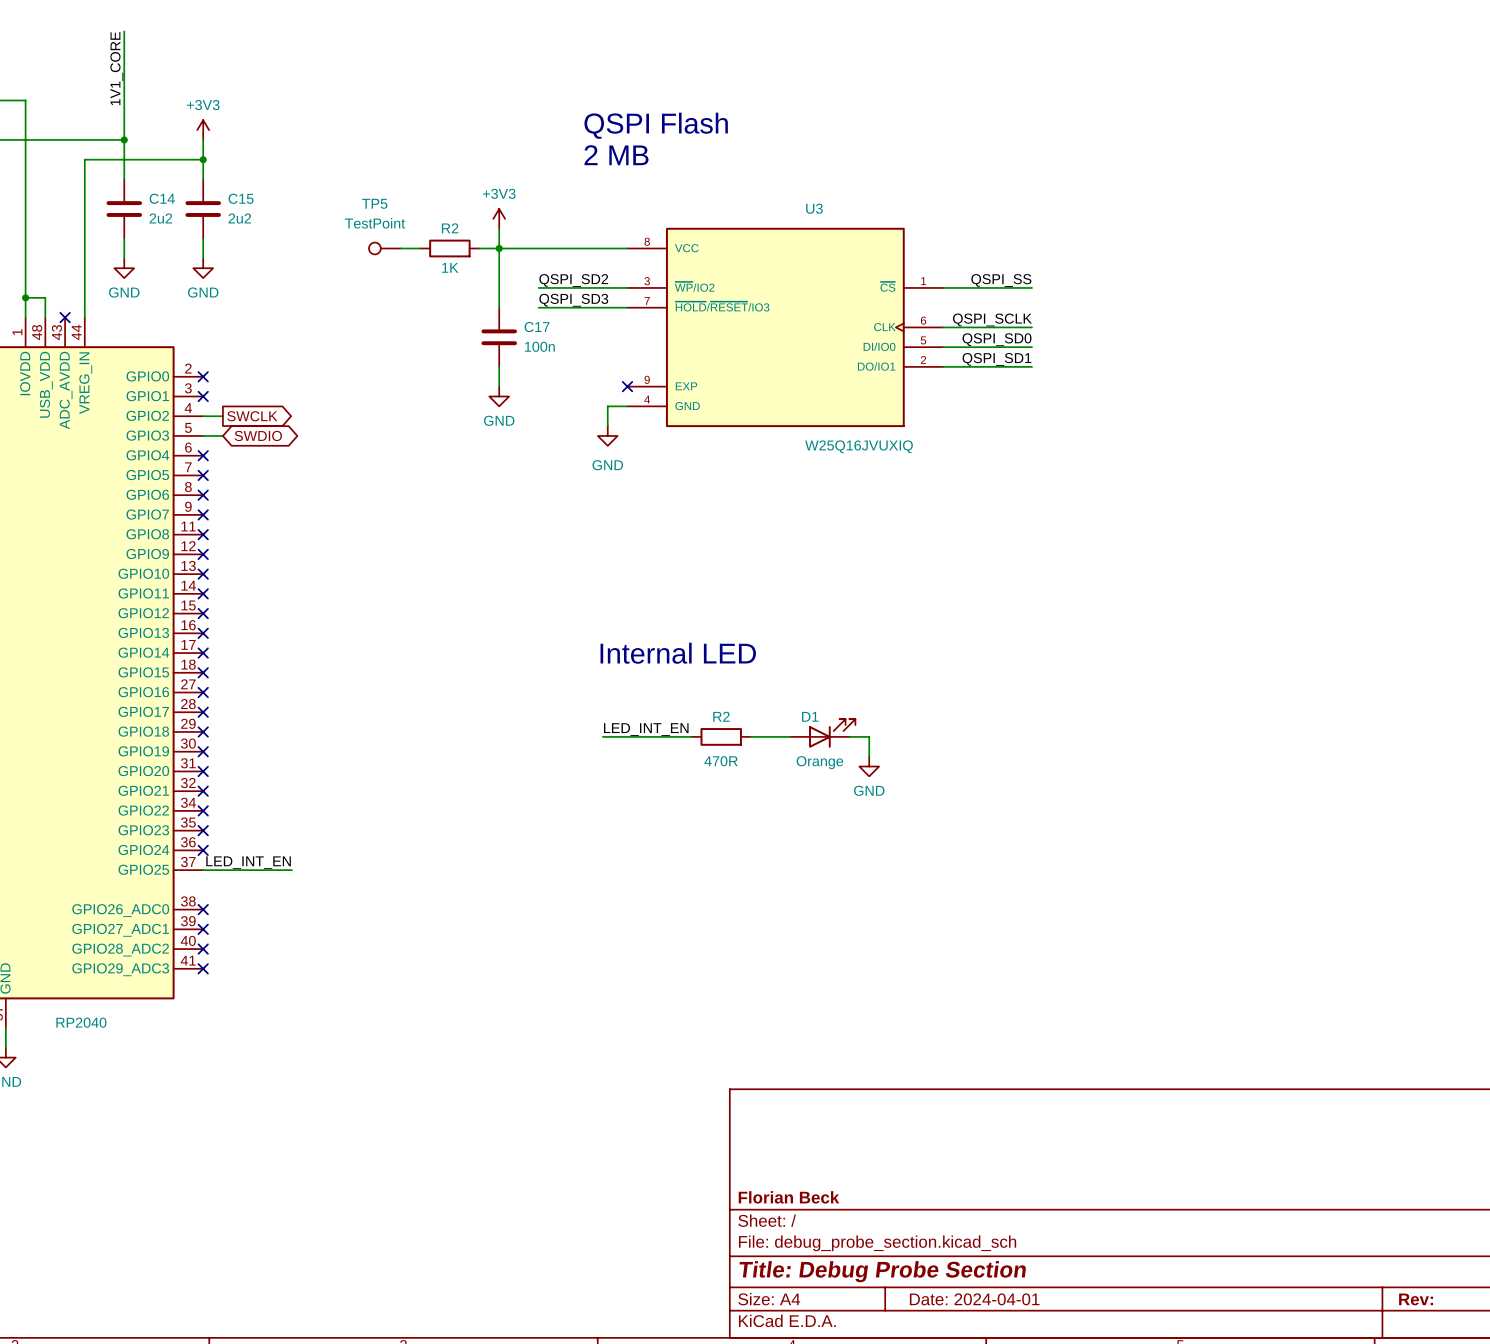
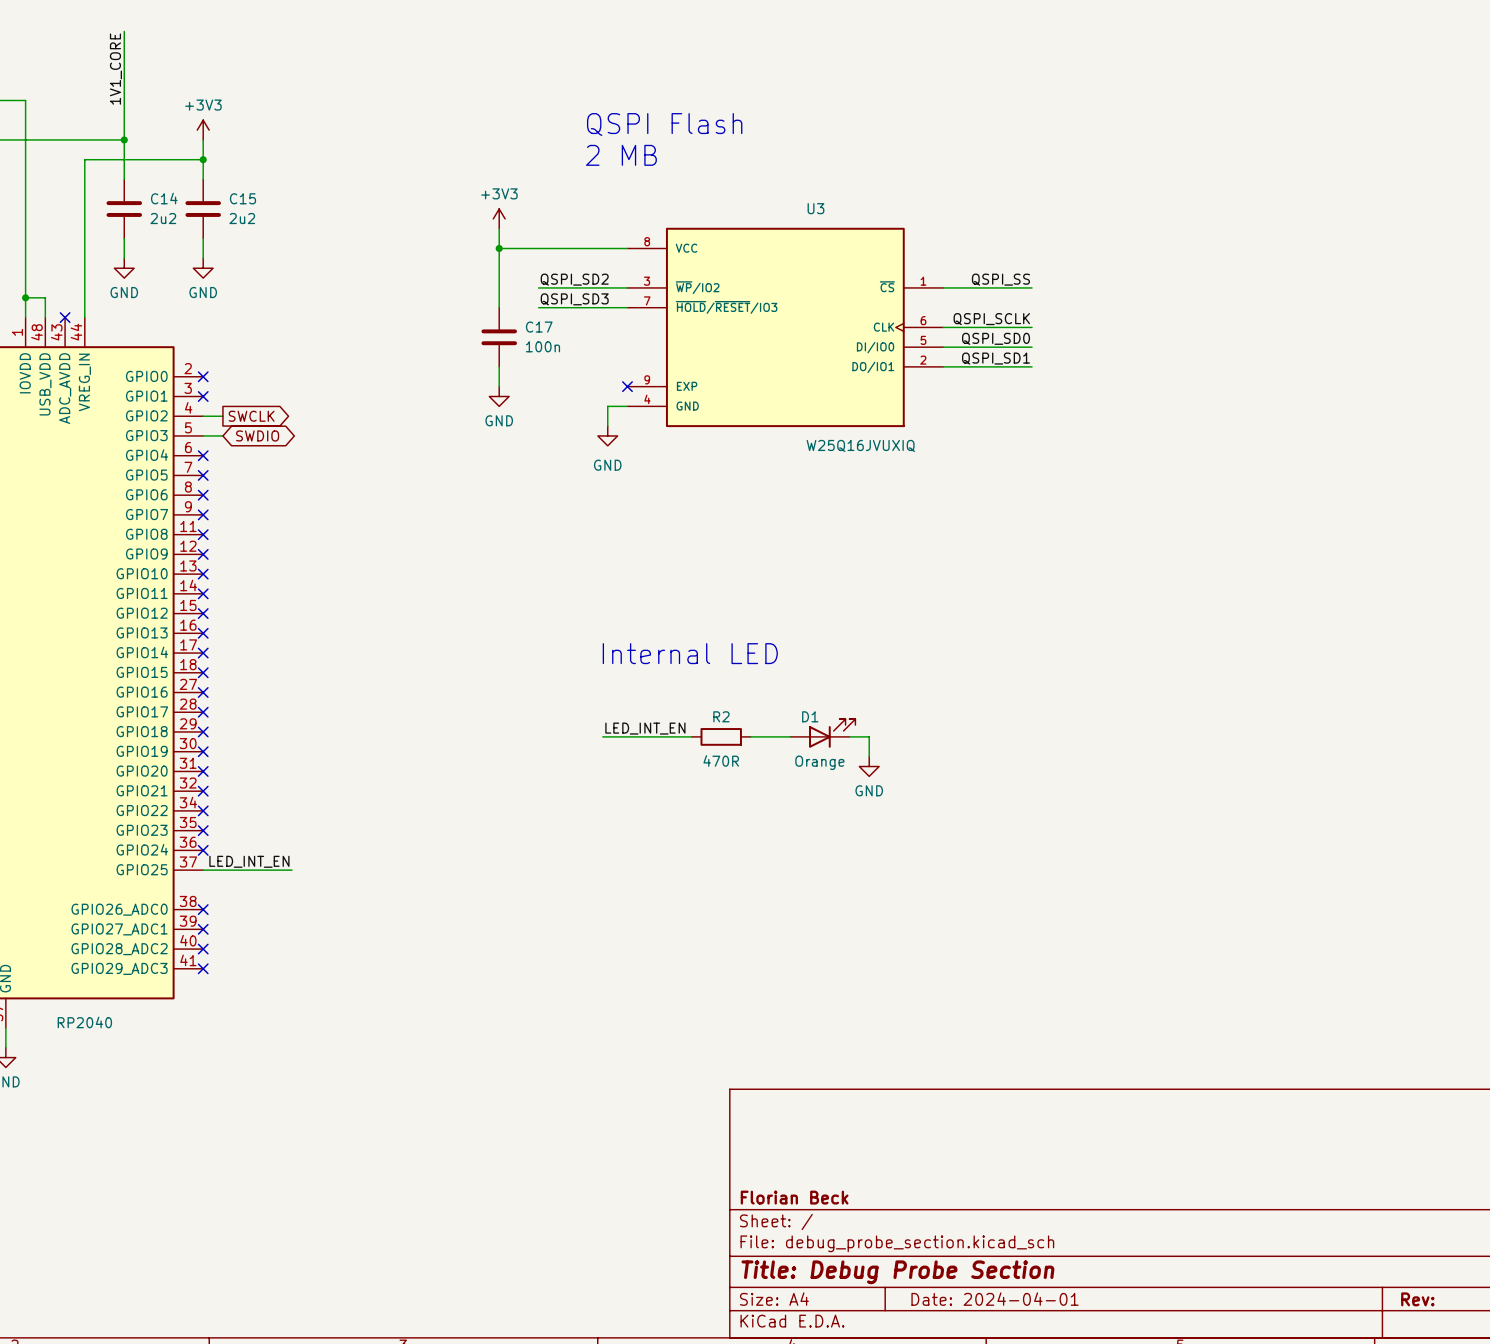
TP5: TestPoint (384, 248) -> none
wire: (400, 248) (420, 248) -> none
R2: 1K (449, 248) -> none
wire: (479, 248) (499, 248) -> none

